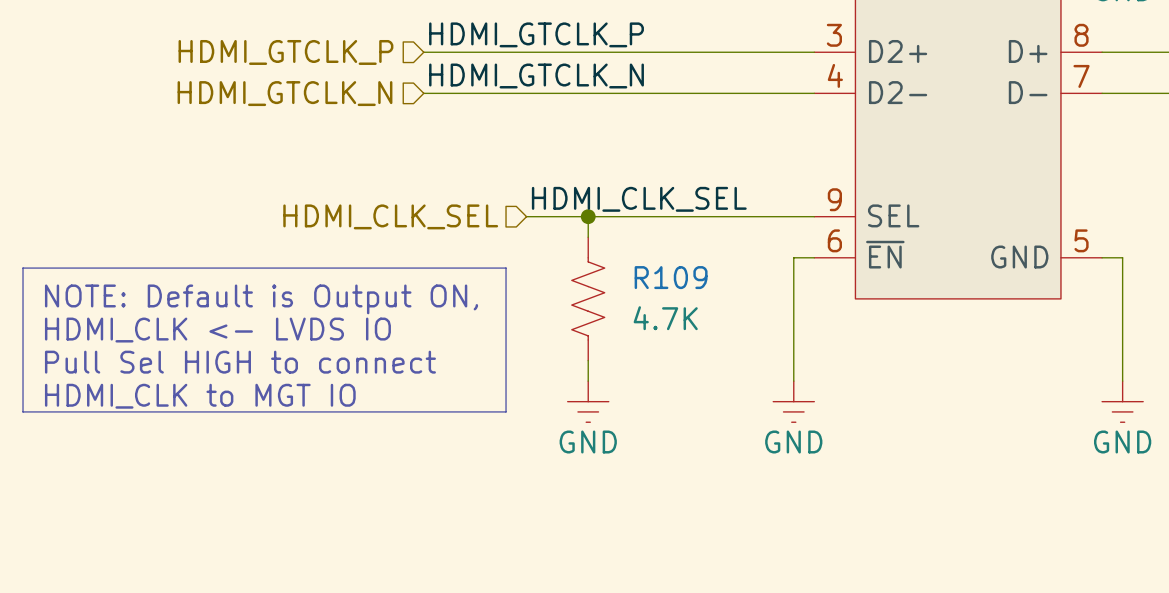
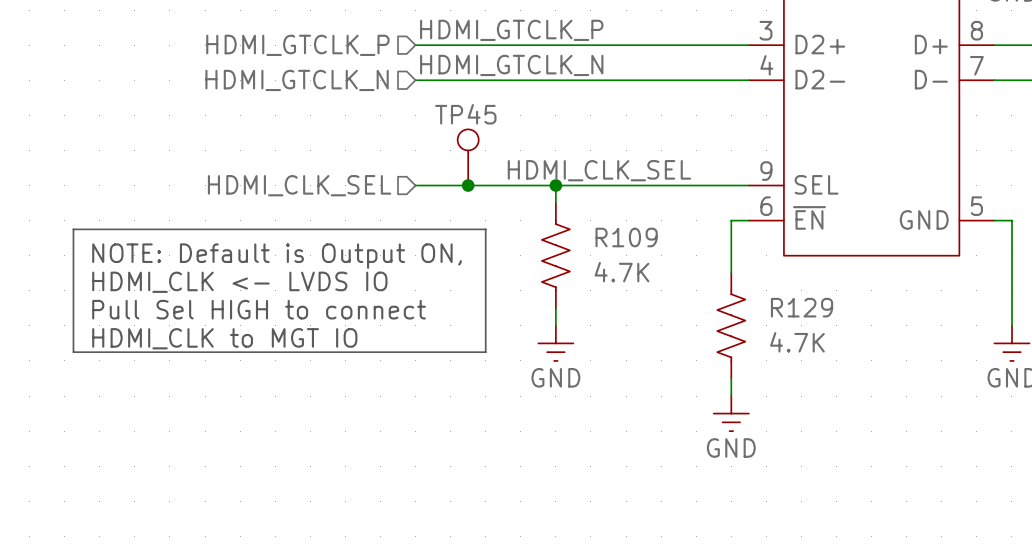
TP45: none -> (468, 157)
hierarchical label position: HDMI_CLK_SEL (390, 216) -> HDMI_CLK_SEL (299, 185)
wire: none -> (415, 185) (503, 185)
junction: none -> (468, 185)
wire: (793, 319) (793, 381) -> none
R129: none -> 4.7K (731, 325)
power symbol position: GND (793, 401) -> GND (731, 413)
wire: none -> (731, 378) (731, 396)

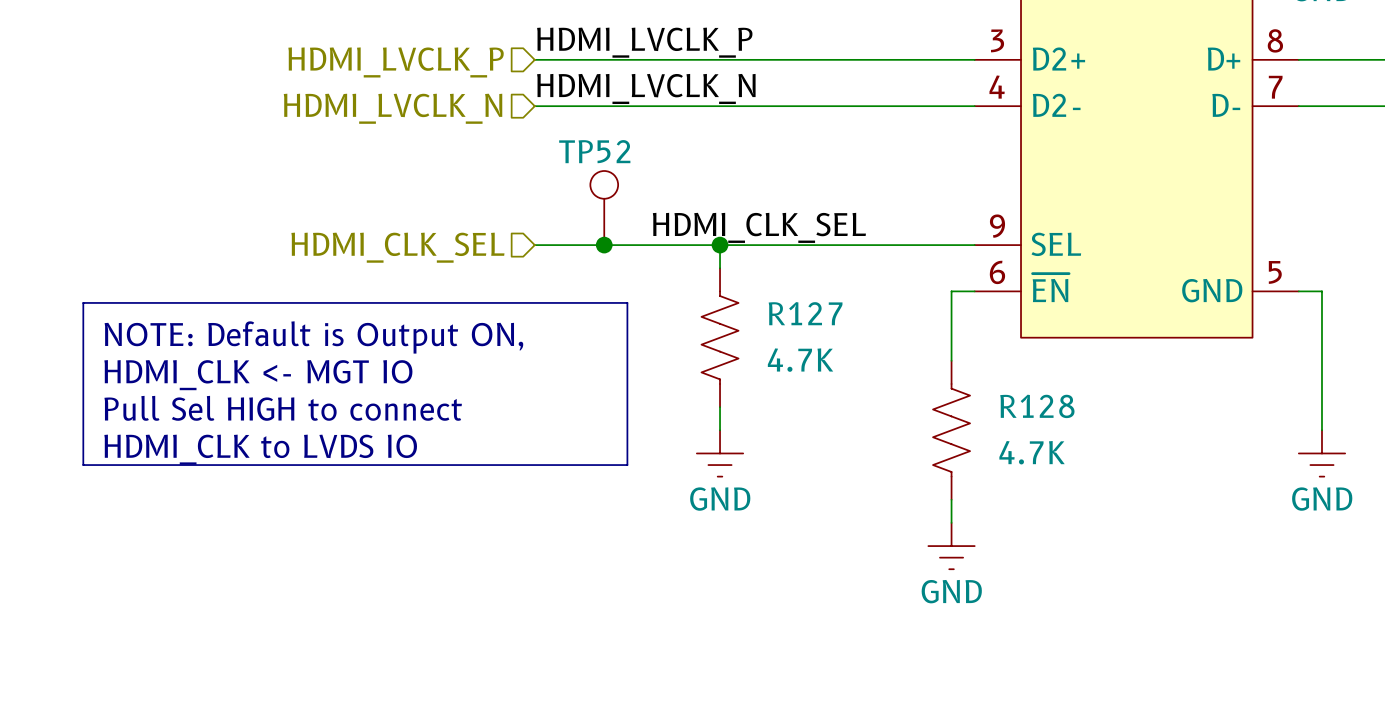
label: HDMI_GTCLK_P (511, 30) -> HDMI_LVCLK_P (644, 42)
hierarchical label: HDMI_GTCLK_P (297, 45) -> HDMI_LVCLK_P (396, 62)
label: HDMI_GTCLK_N (511, 65) -> HDMI_LVCLK_N (646, 88)
hierarchical label: HDMI_GTCLK_N (297, 80) -> HDMI_LVCLK_N (393, 108)
TP45 name: TP45 (465, 114) -> TP52 (594, 151)
R109 name: R109 (626, 237) -> R127 (805, 313)
text: HDMI_CLK <- LVDS IO (239, 282) -> HDMI_CLK <- MGT IO (258, 375)
R129 name: R129 (802, 307) -> R128 (1037, 406)
text: HDMI_CLK to MGT IO (224, 338) -> HDMI_CLK to LVDS IO (260, 449)

